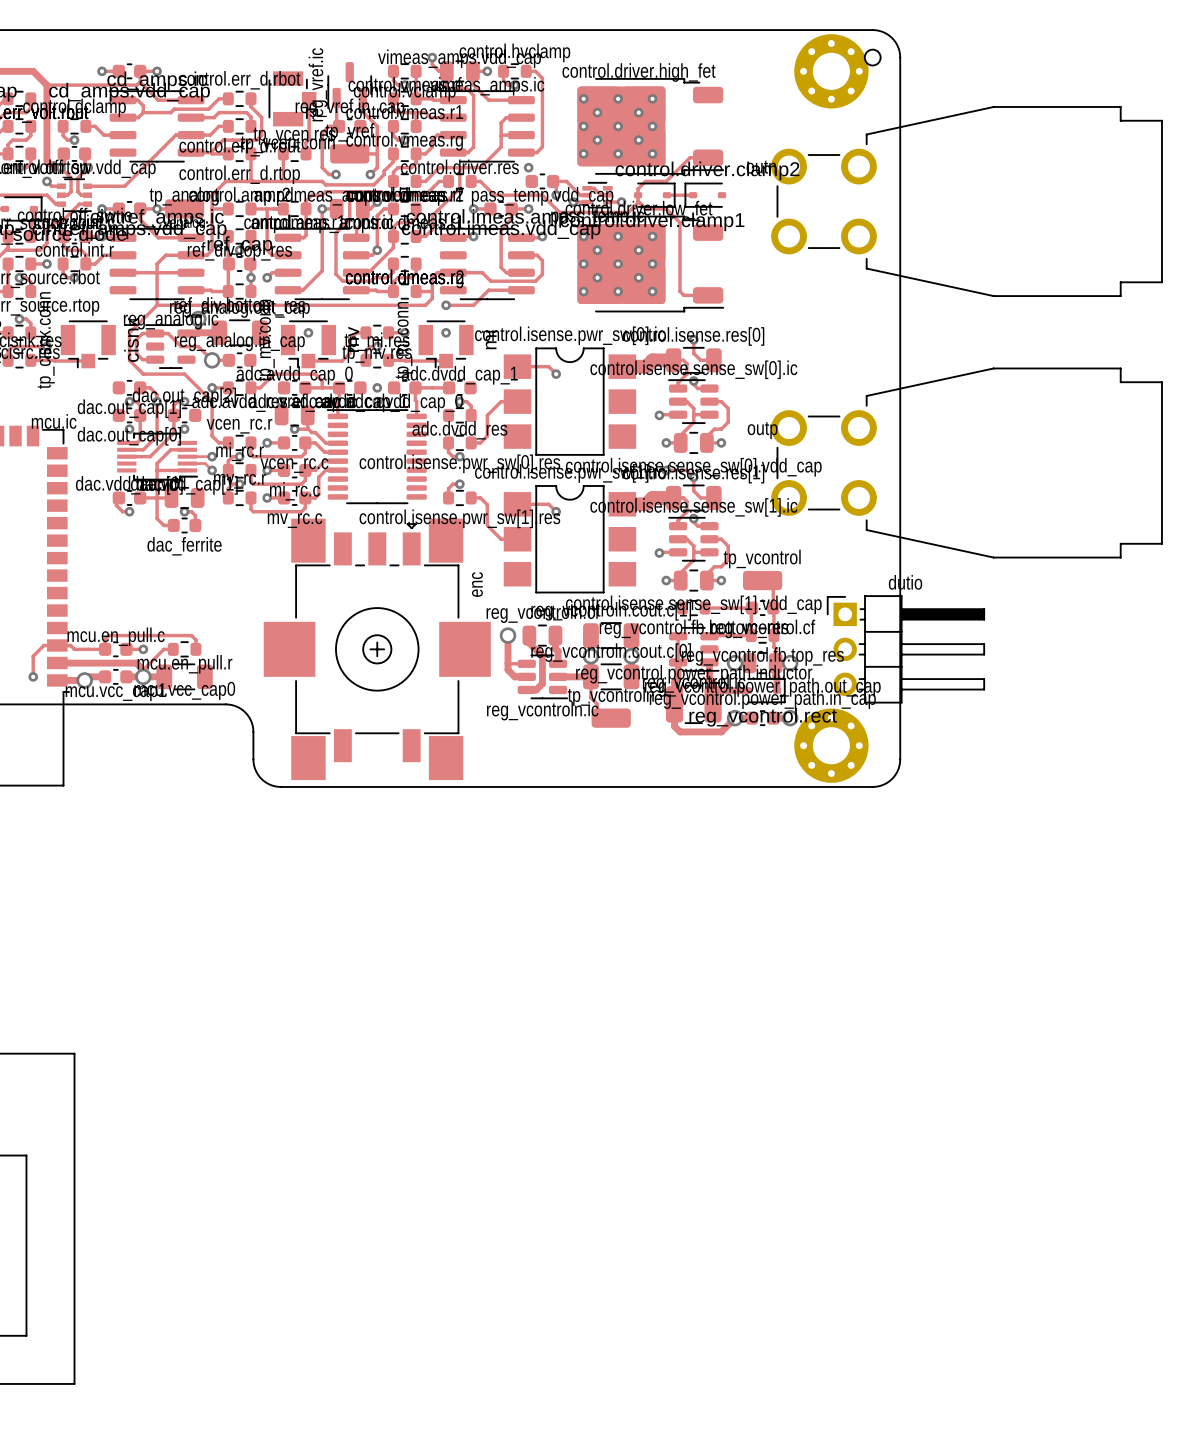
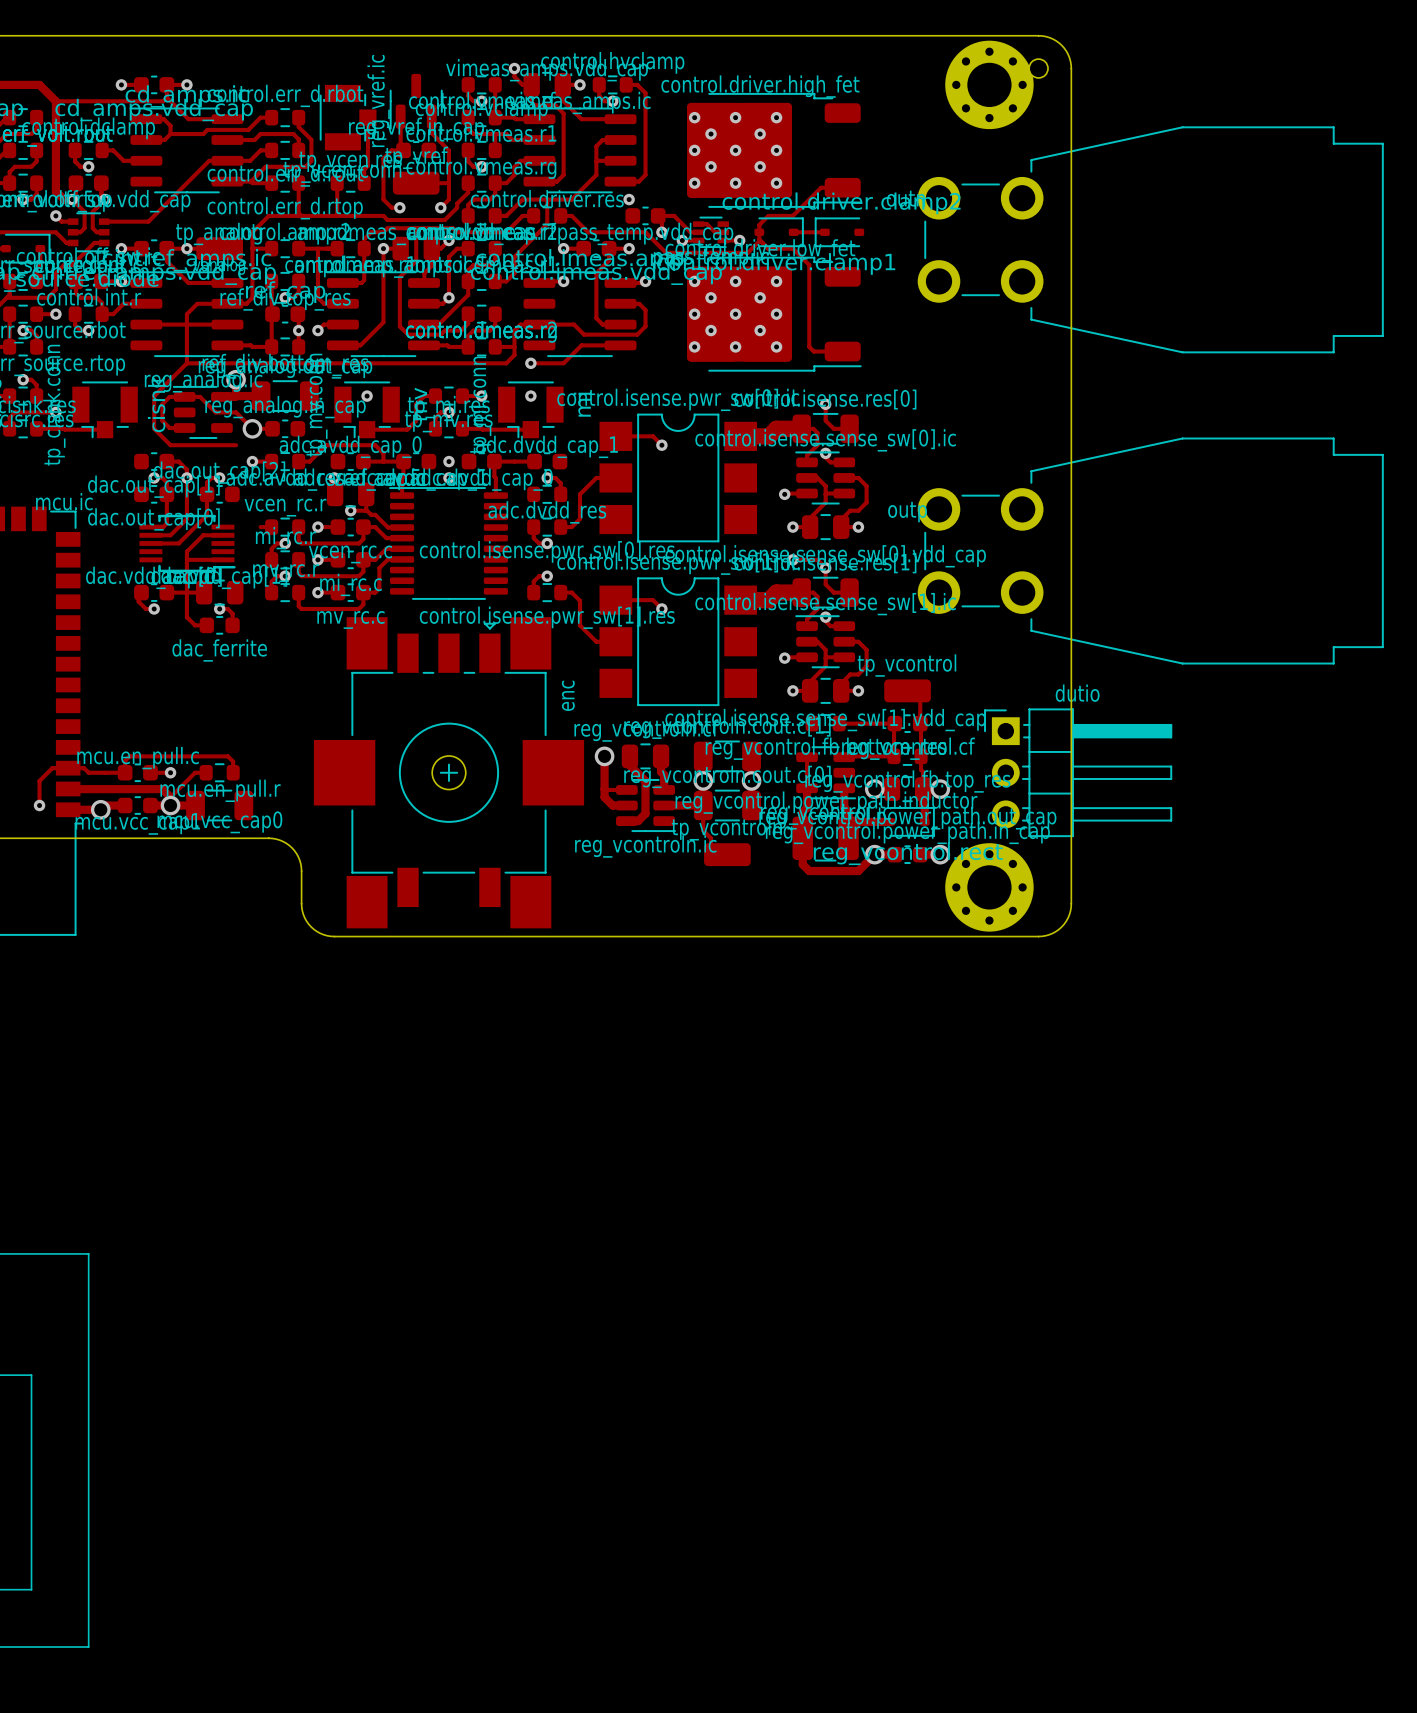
track: (184, 374) (212, 401) (212, 436) (219, 442) -> (219, 445) (236, 445)
via: (129, 429) -> none
via: (184, 429) -> none
track: (187, 456) (212, 456) -> none
via: (212, 456) -> none
track: (187, 463) (205, 463) (212, 470) -> none
via: (212, 470) -> none

